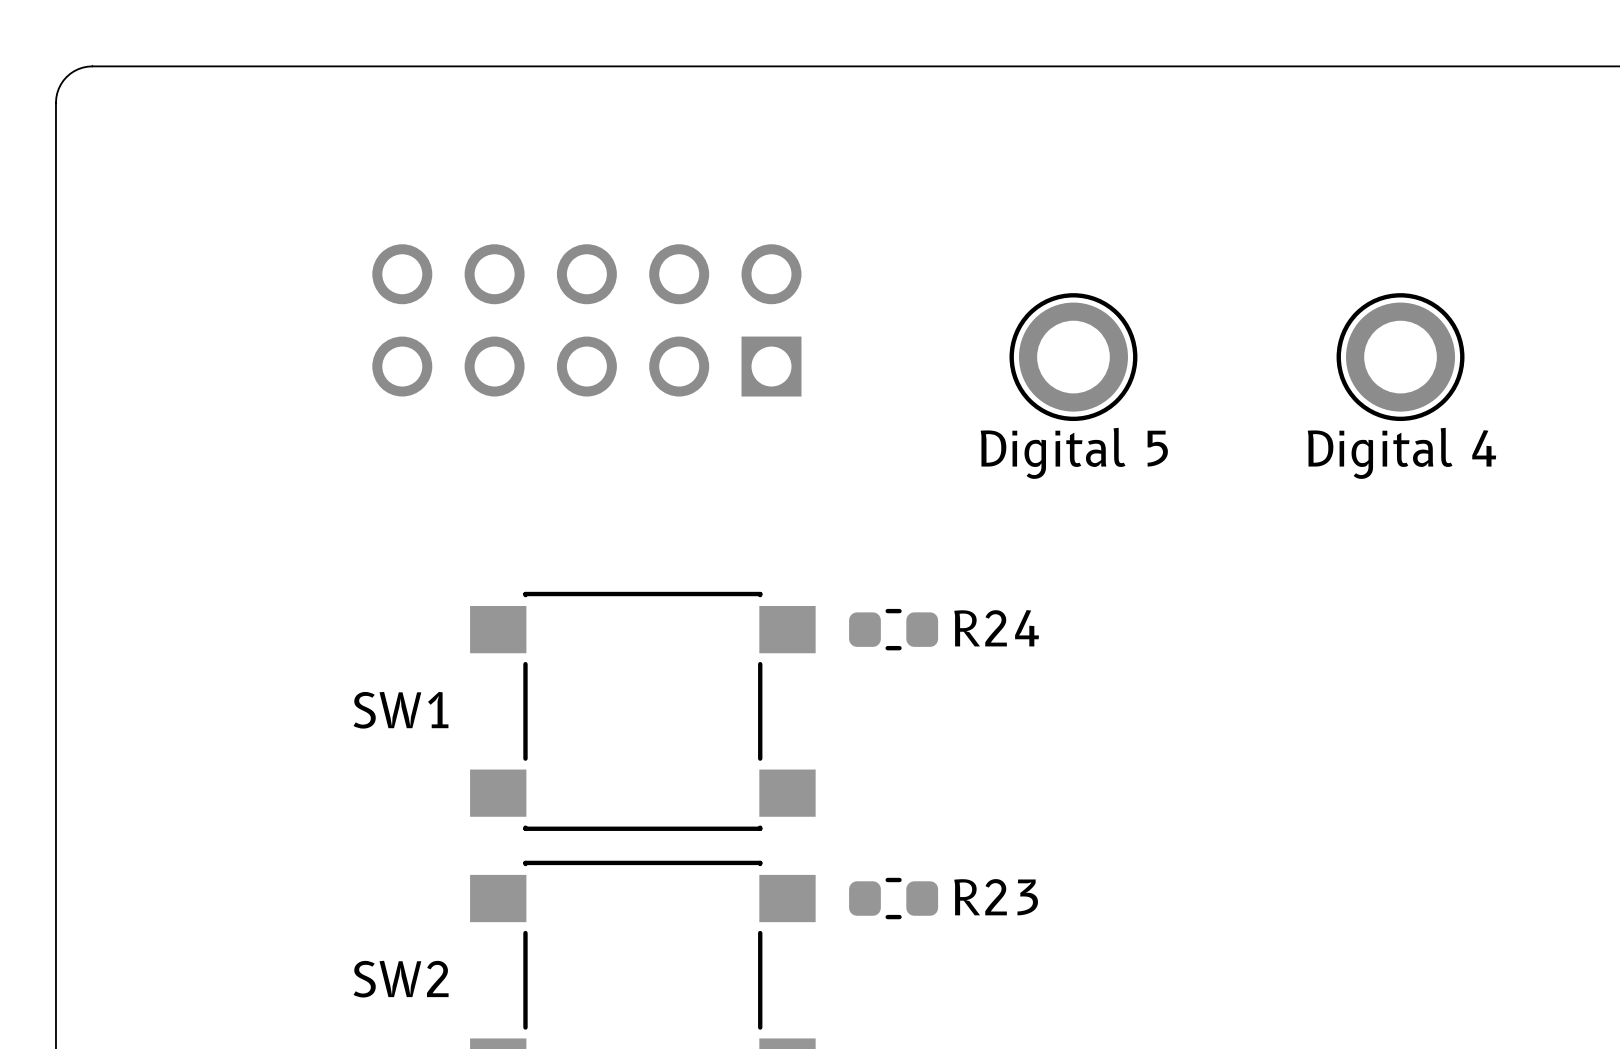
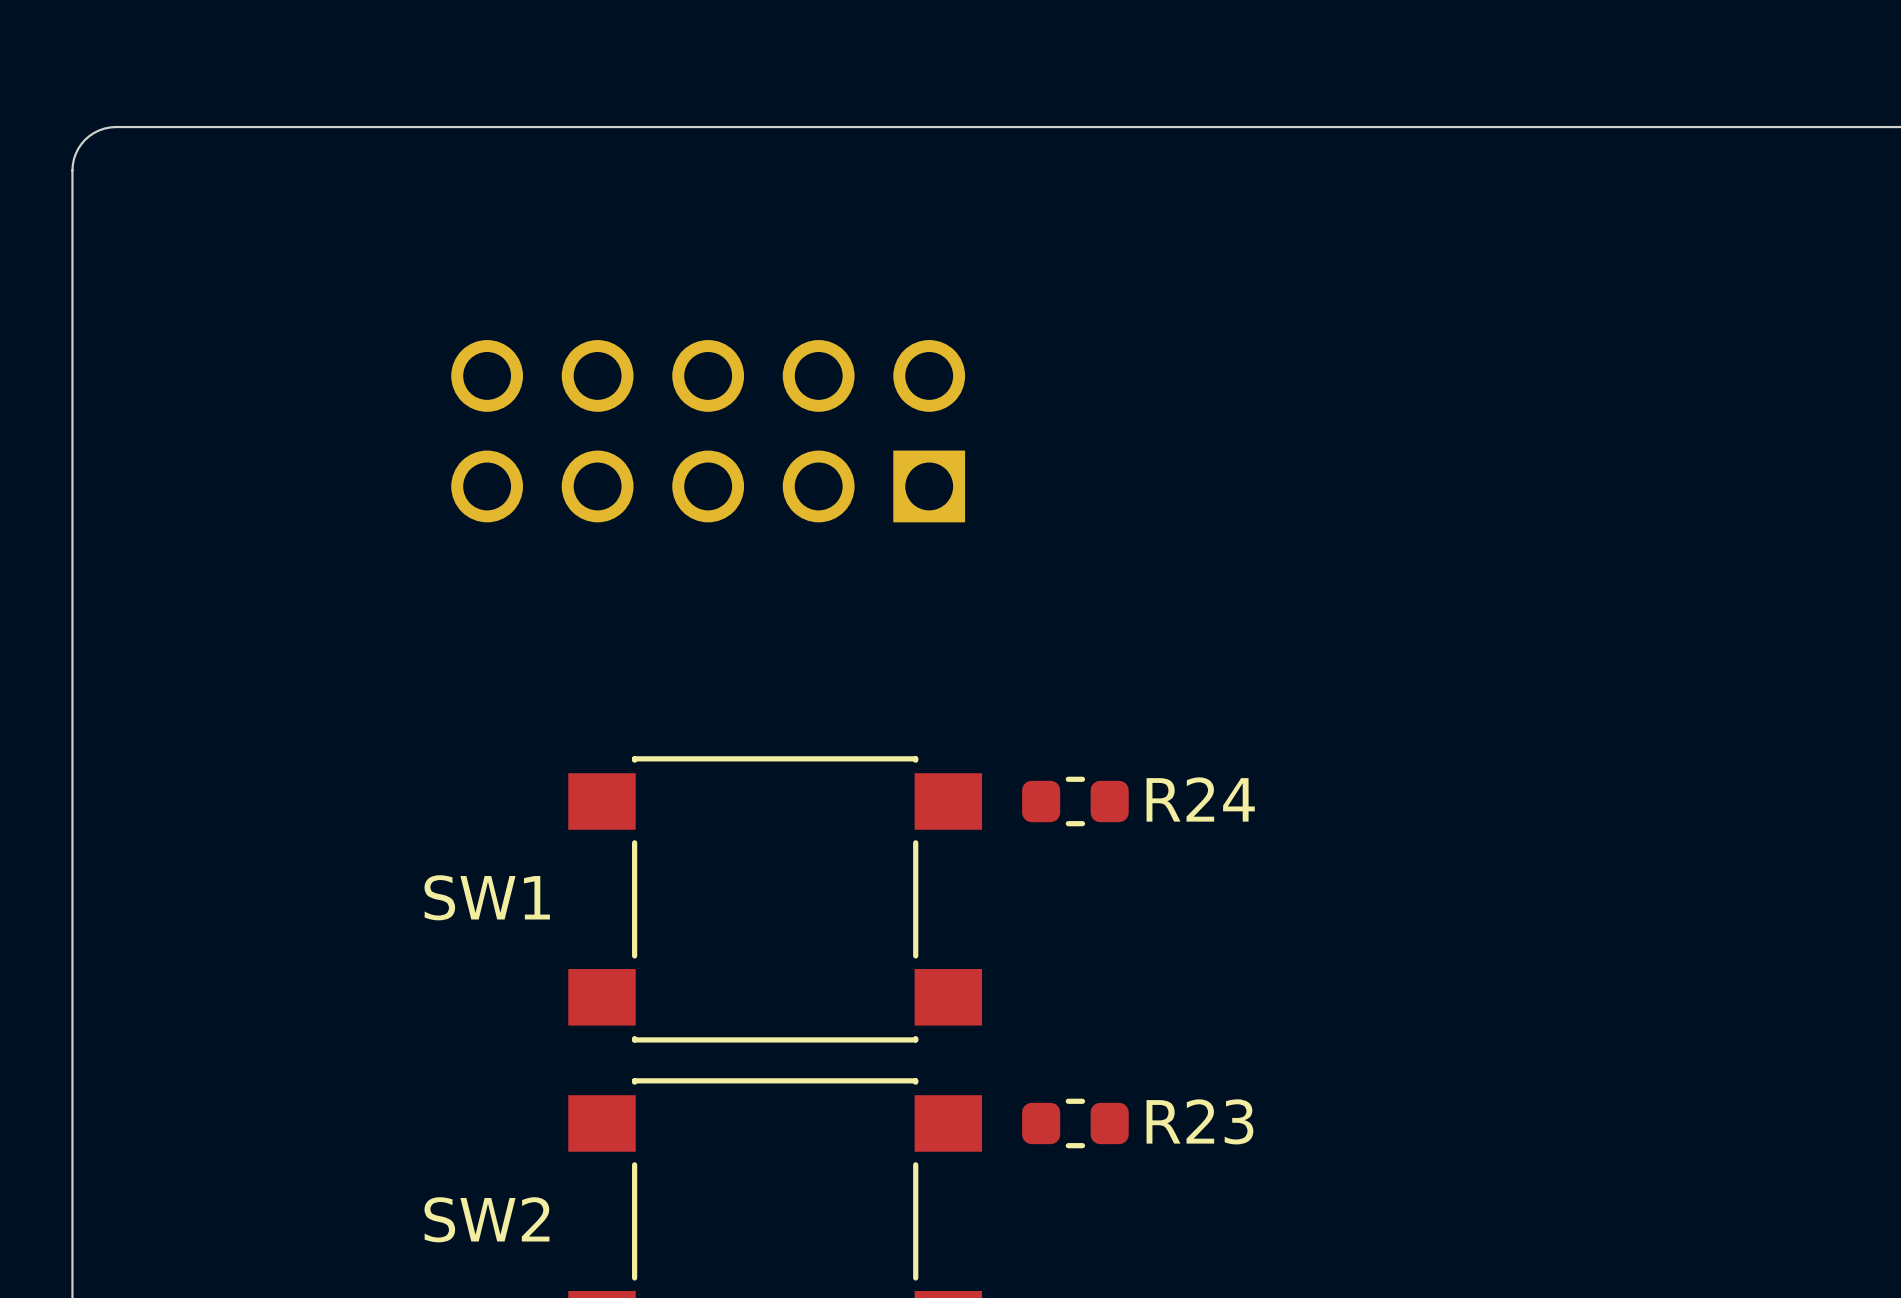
part: (1073, 357) -> none
part: (1400, 357) -> none
text: Digital 5 (1074, 453) -> none
text: Digital 4 (1401, 453) -> none

